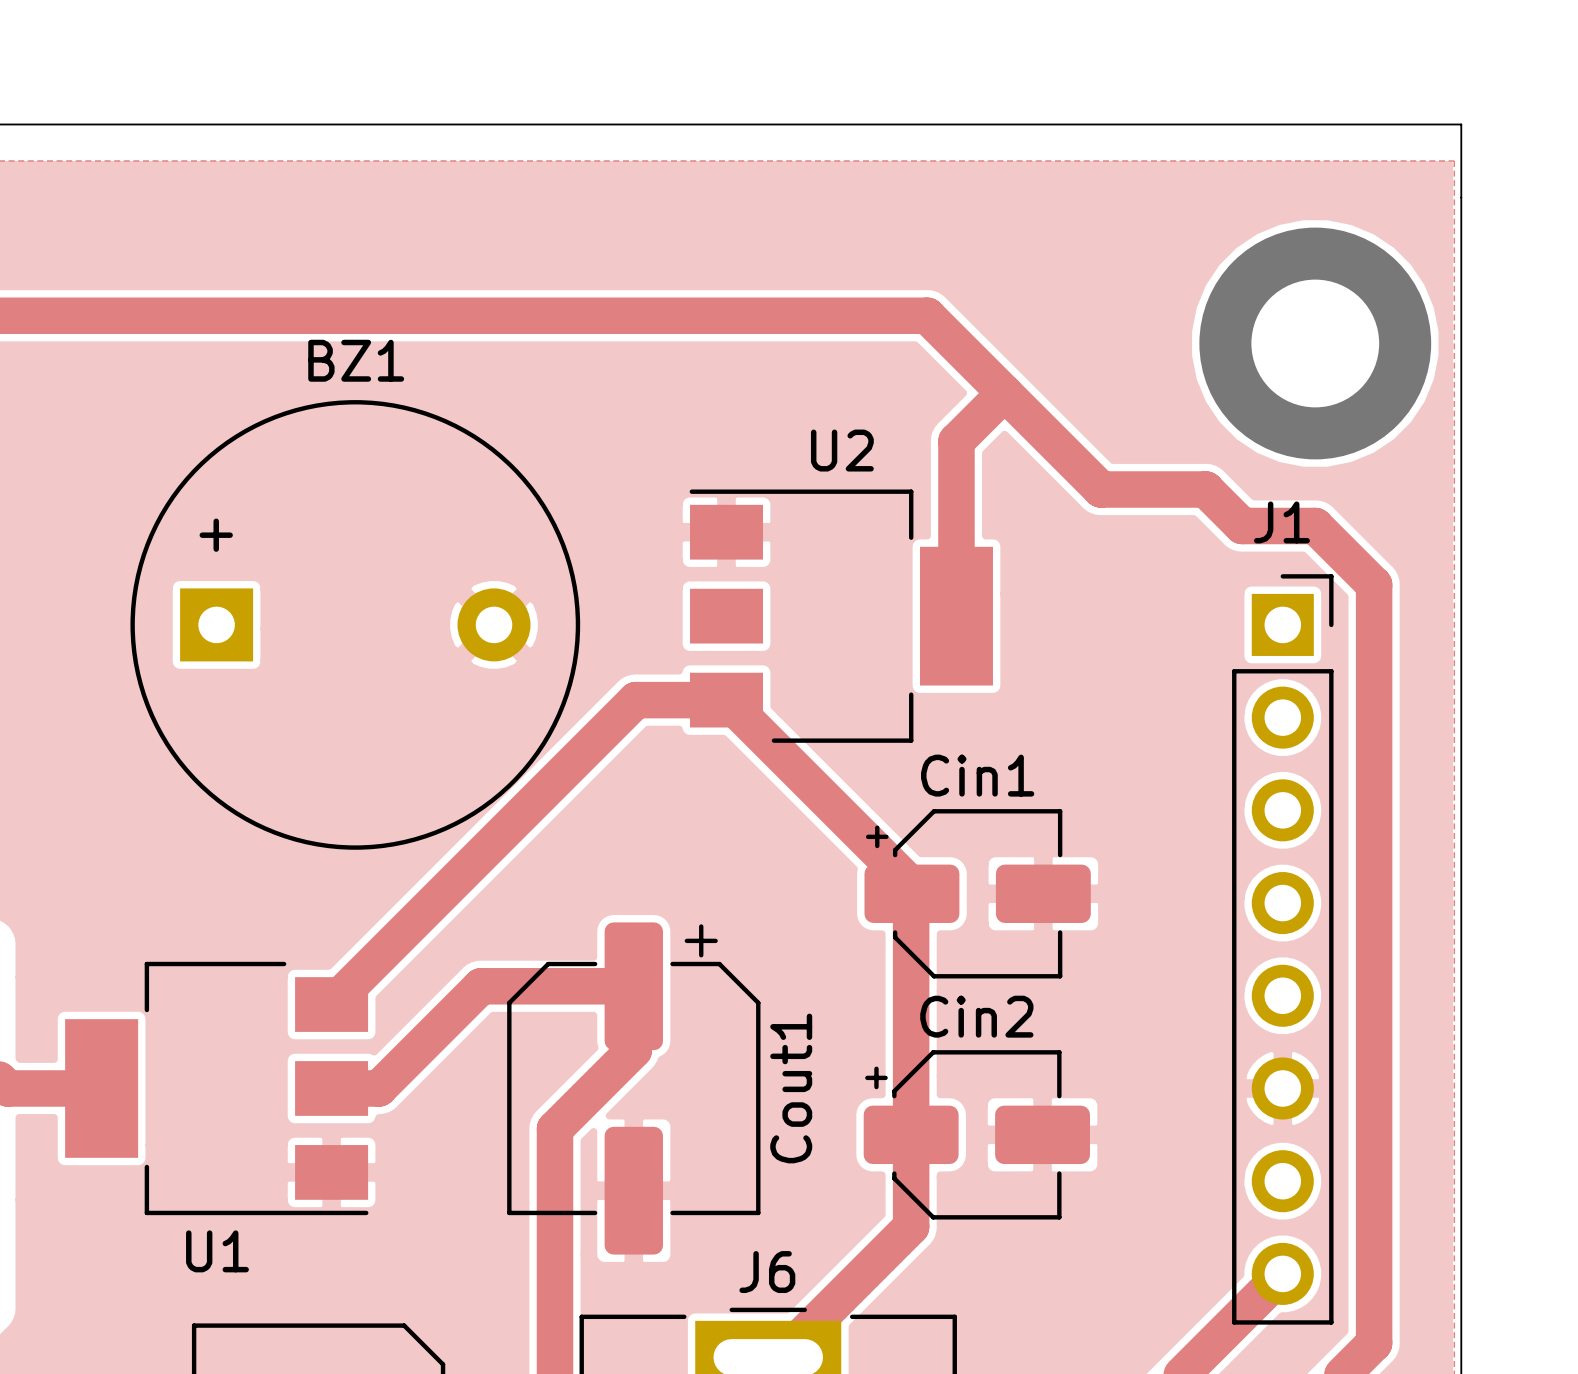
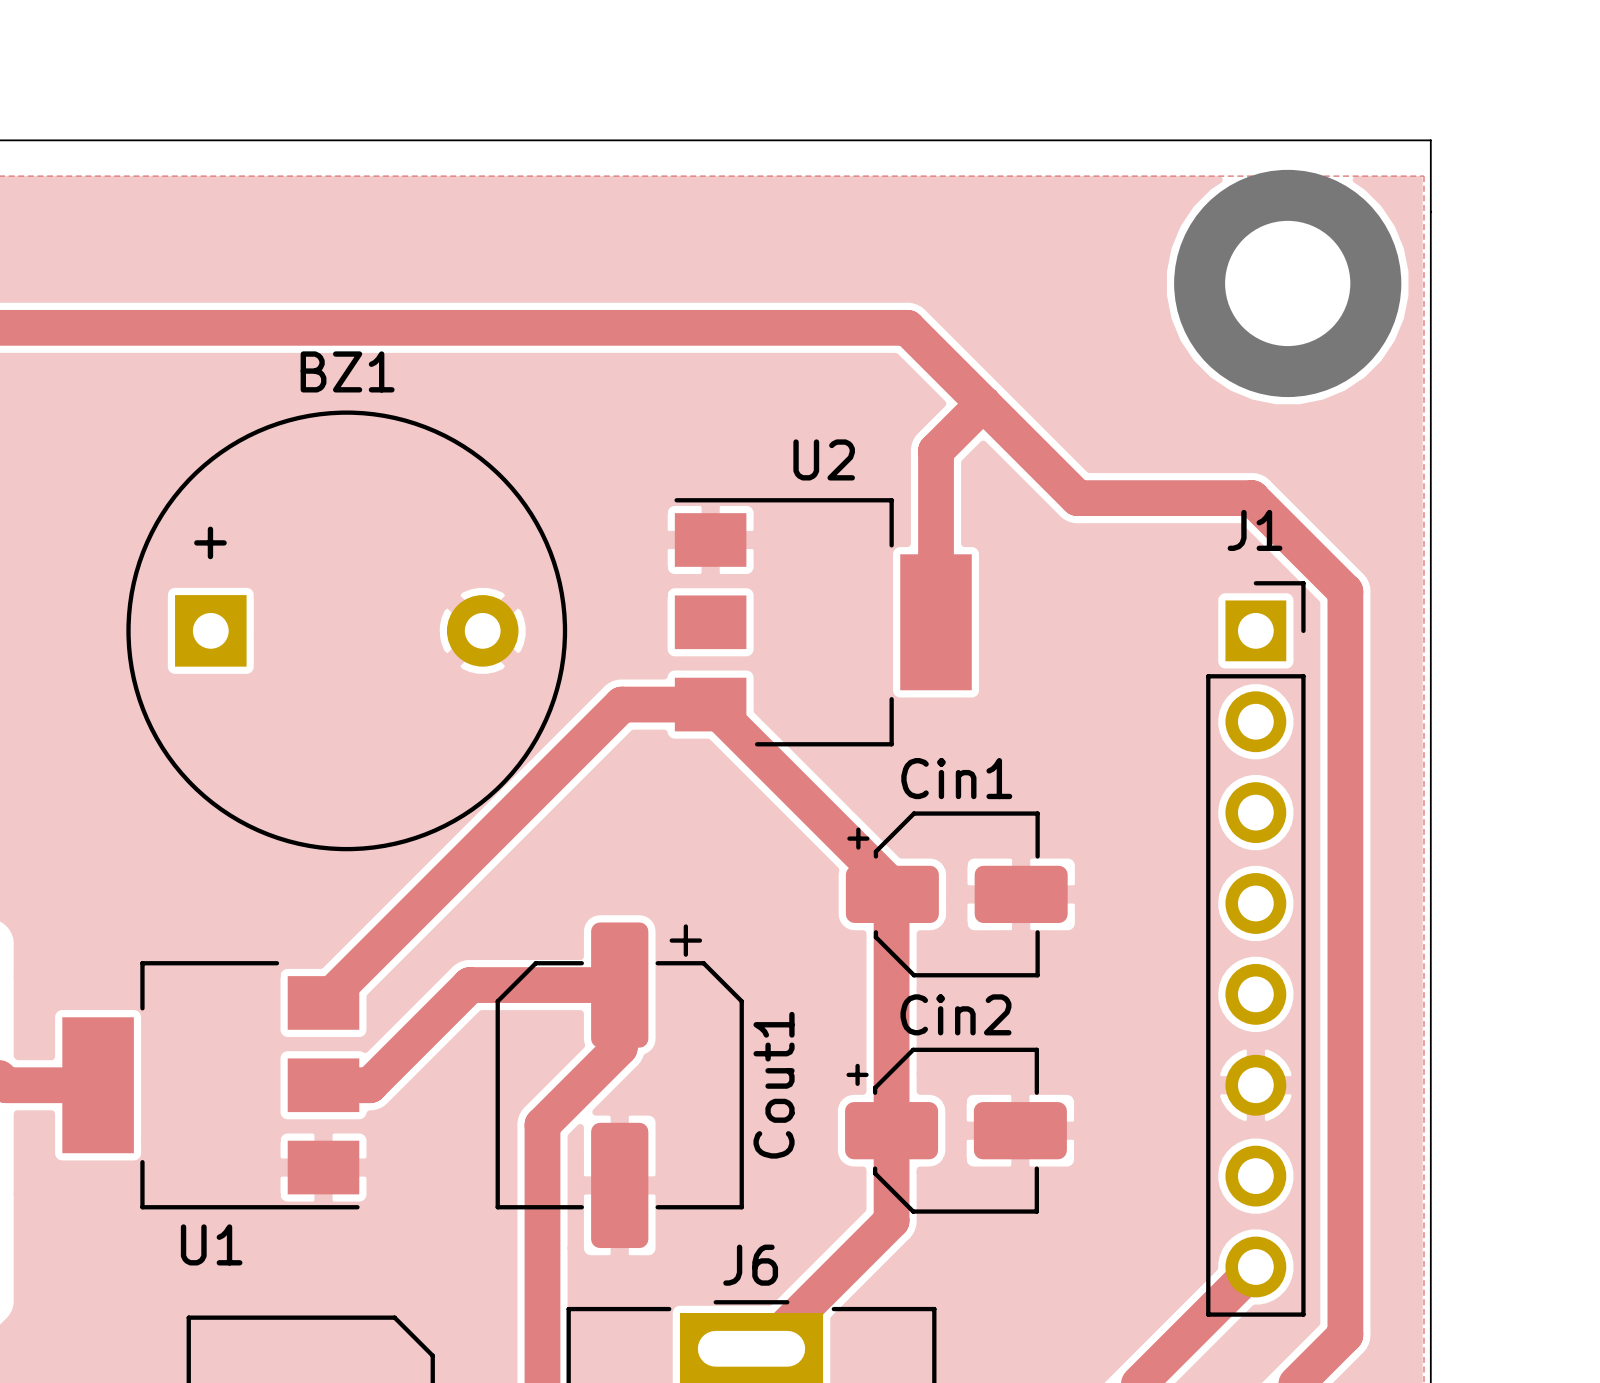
via position: (1315, 343) -> (1287, 283)
track: (1205, 489) (1242, 526) (1315, 526) -> (1180, 498) (1251, 498) (1287, 533)

